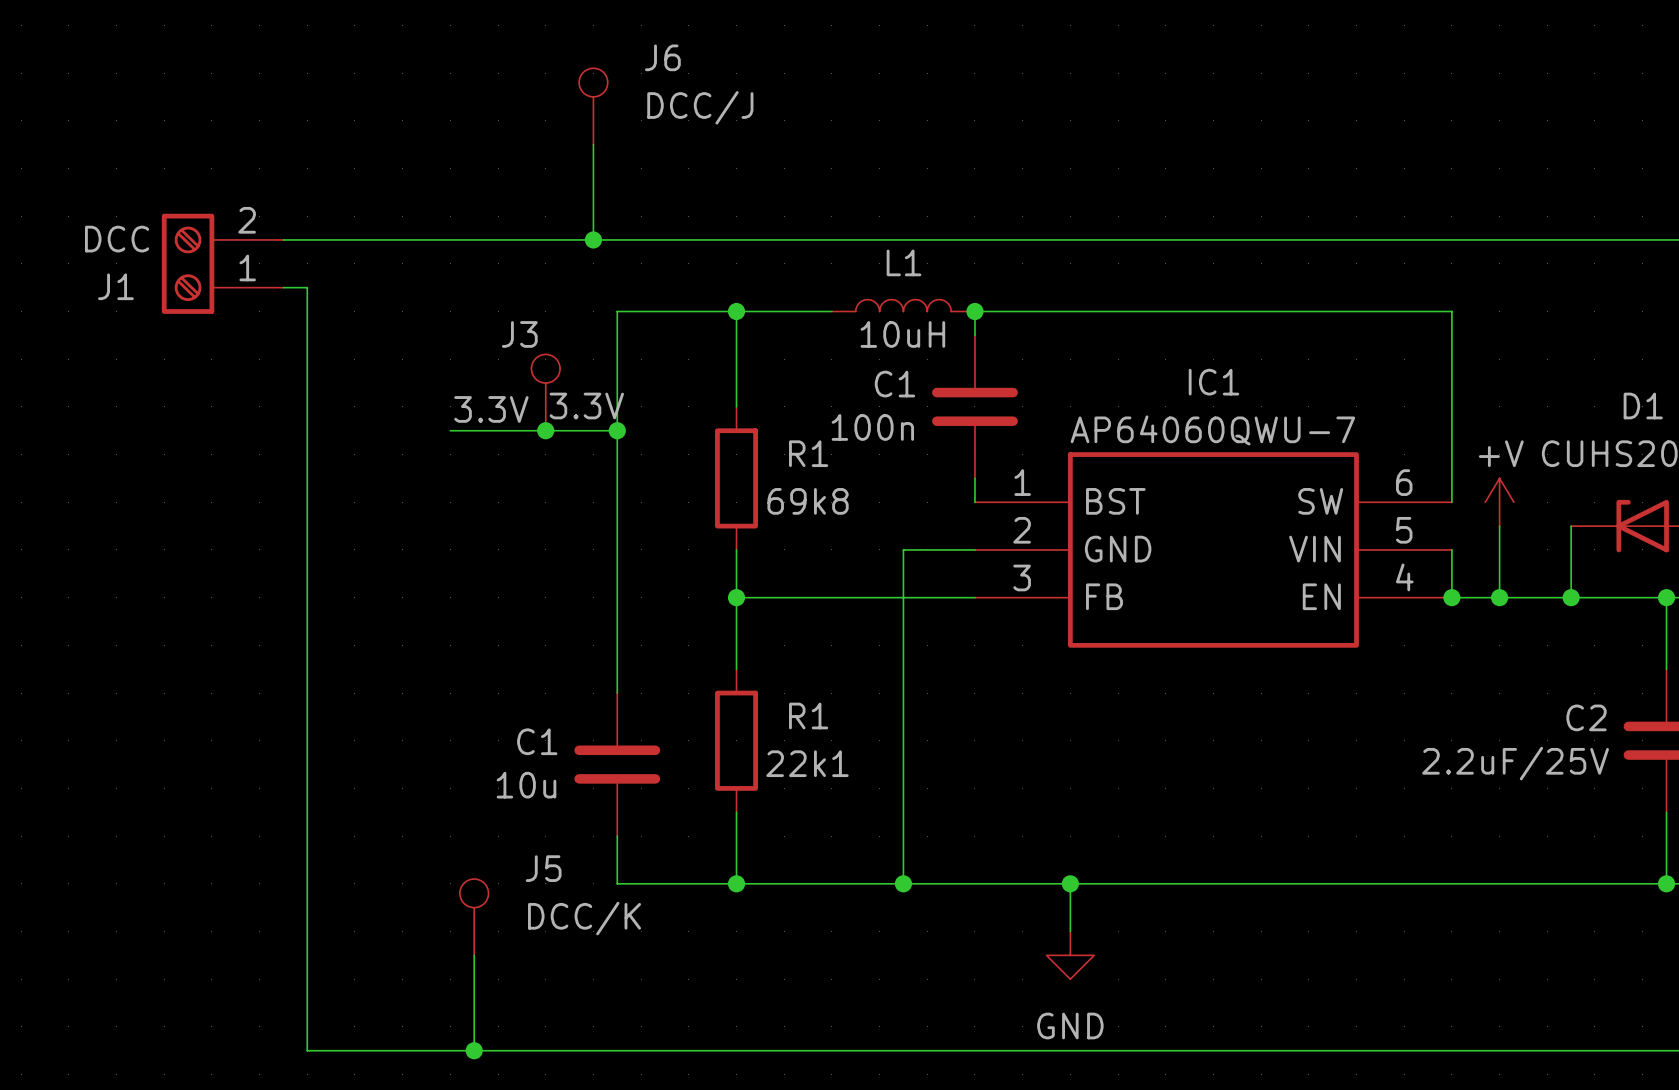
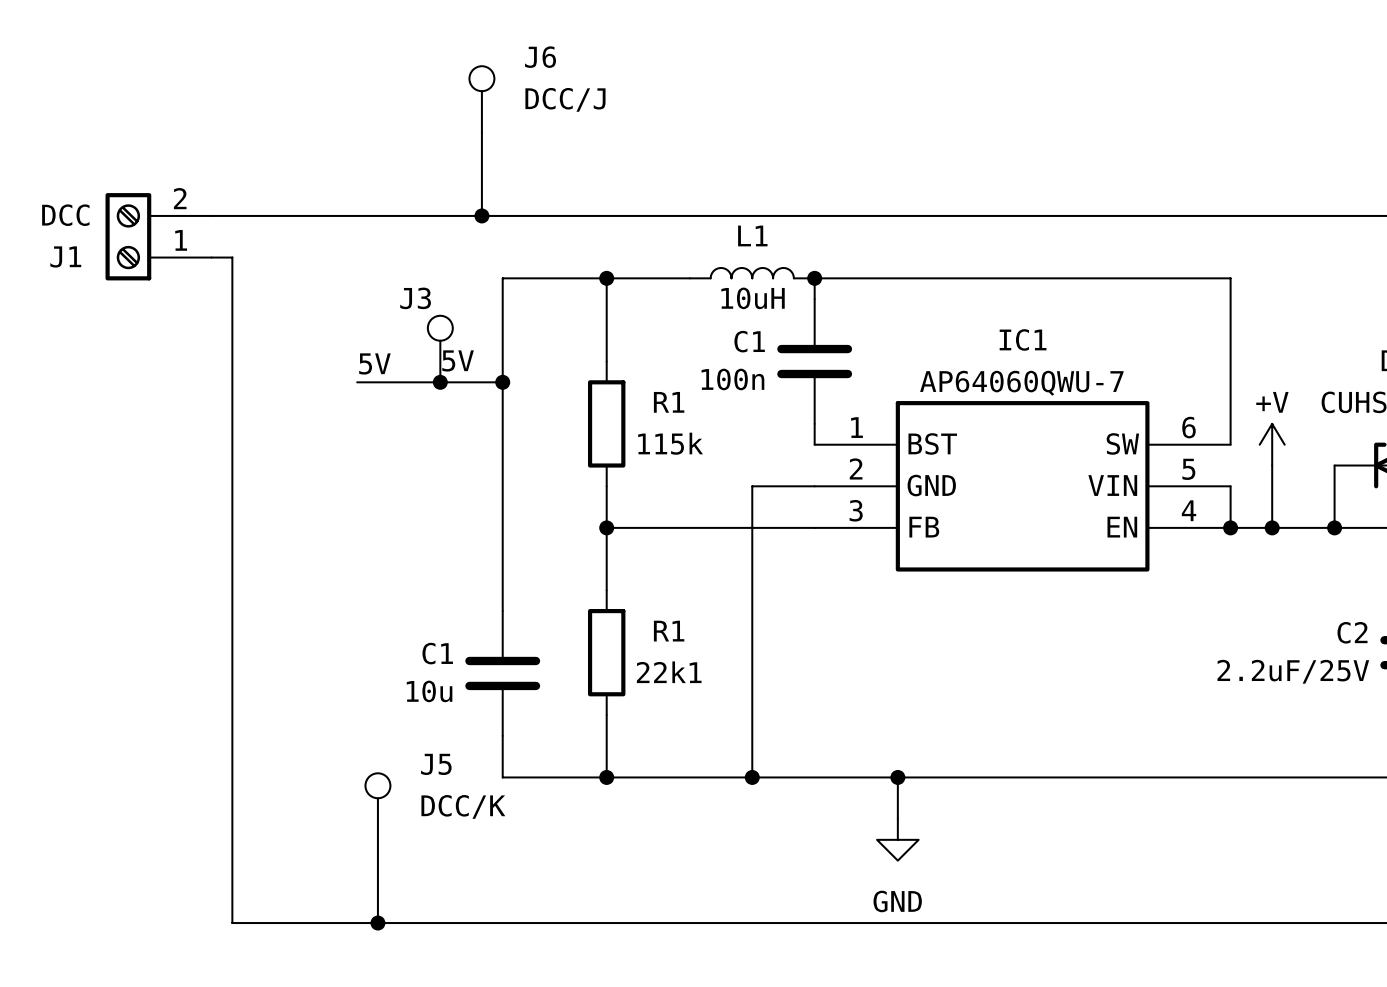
J3 value: 3.3V (586, 405) -> 5V (458, 360)
label: 3.3V (491, 409) -> 5V (374, 363)
R1 value: 69k8 (808, 501) -> 115k (670, 443)

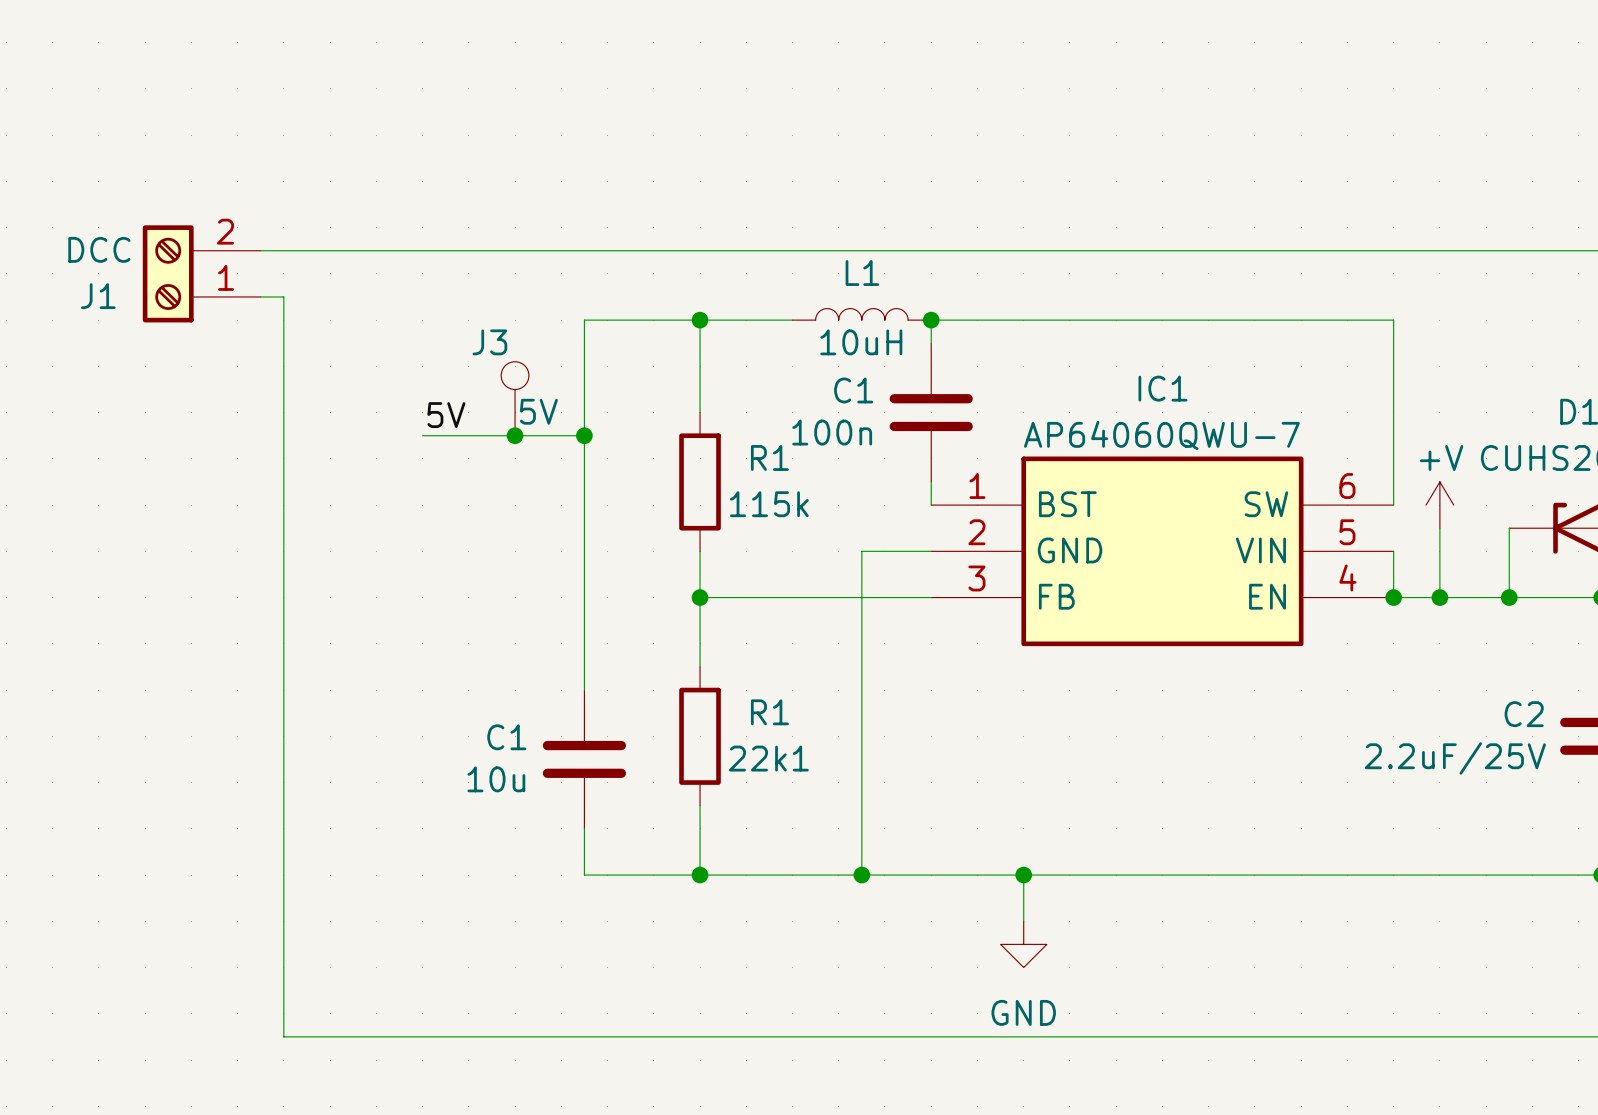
J6: DCC/J (481, 99) -> none
wire: (481, 132) (481, 215) -> none
junction: (481, 215) -> none
J5: DCC/K (377, 806) -> none
wire: (377, 839) (377, 923) -> none
junction: (377, 923) -> none

